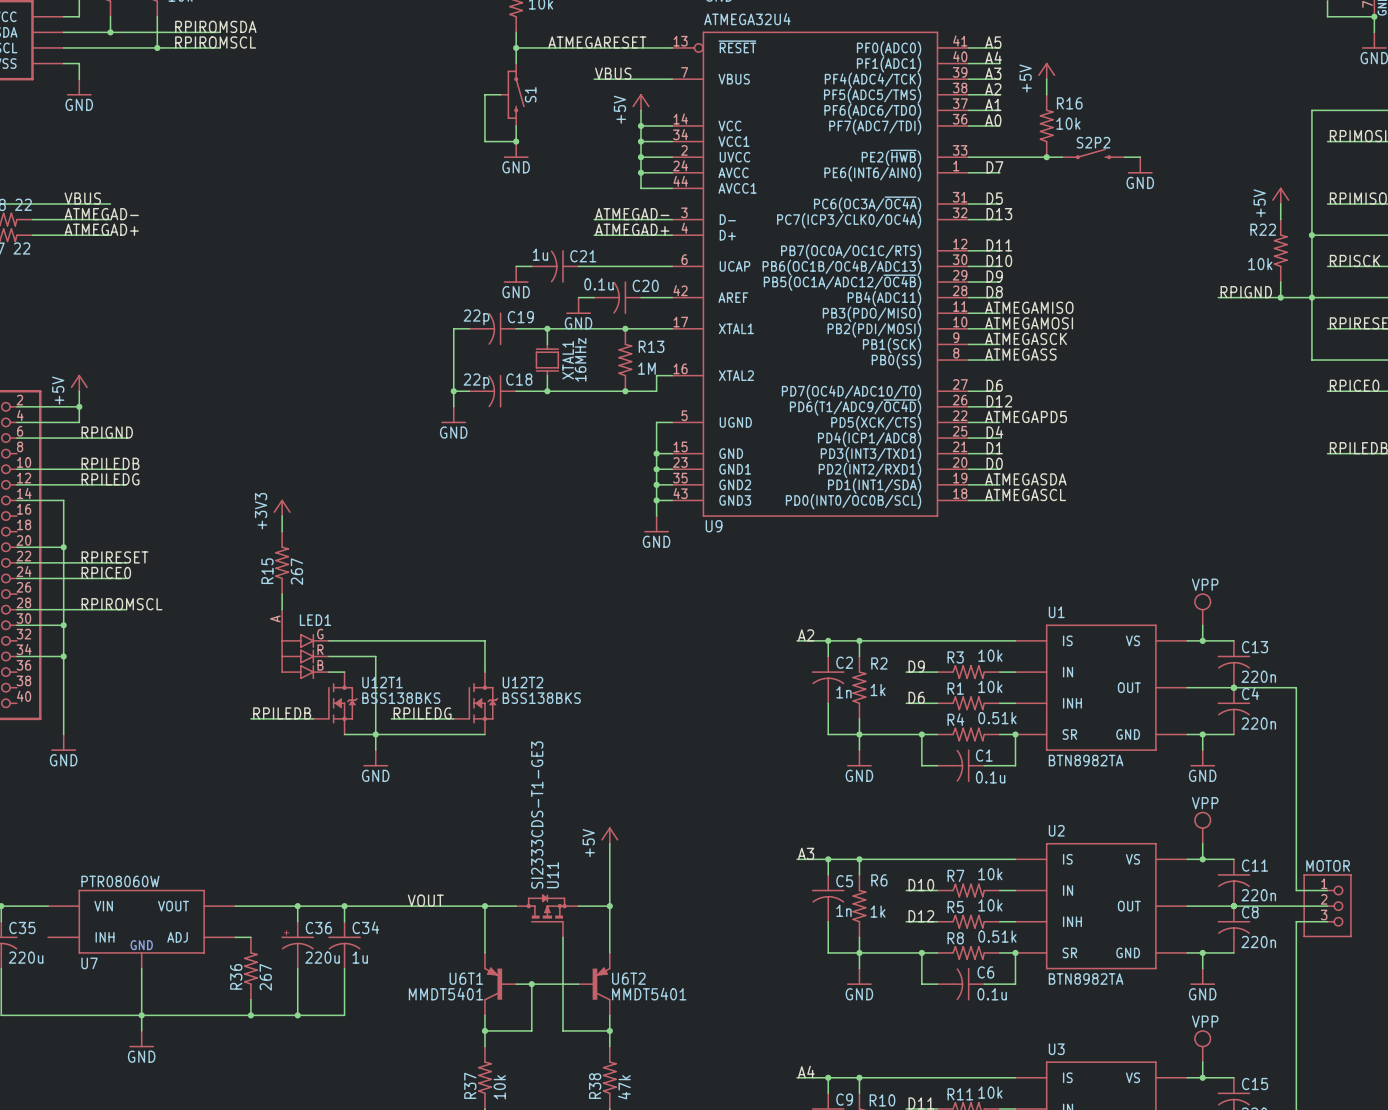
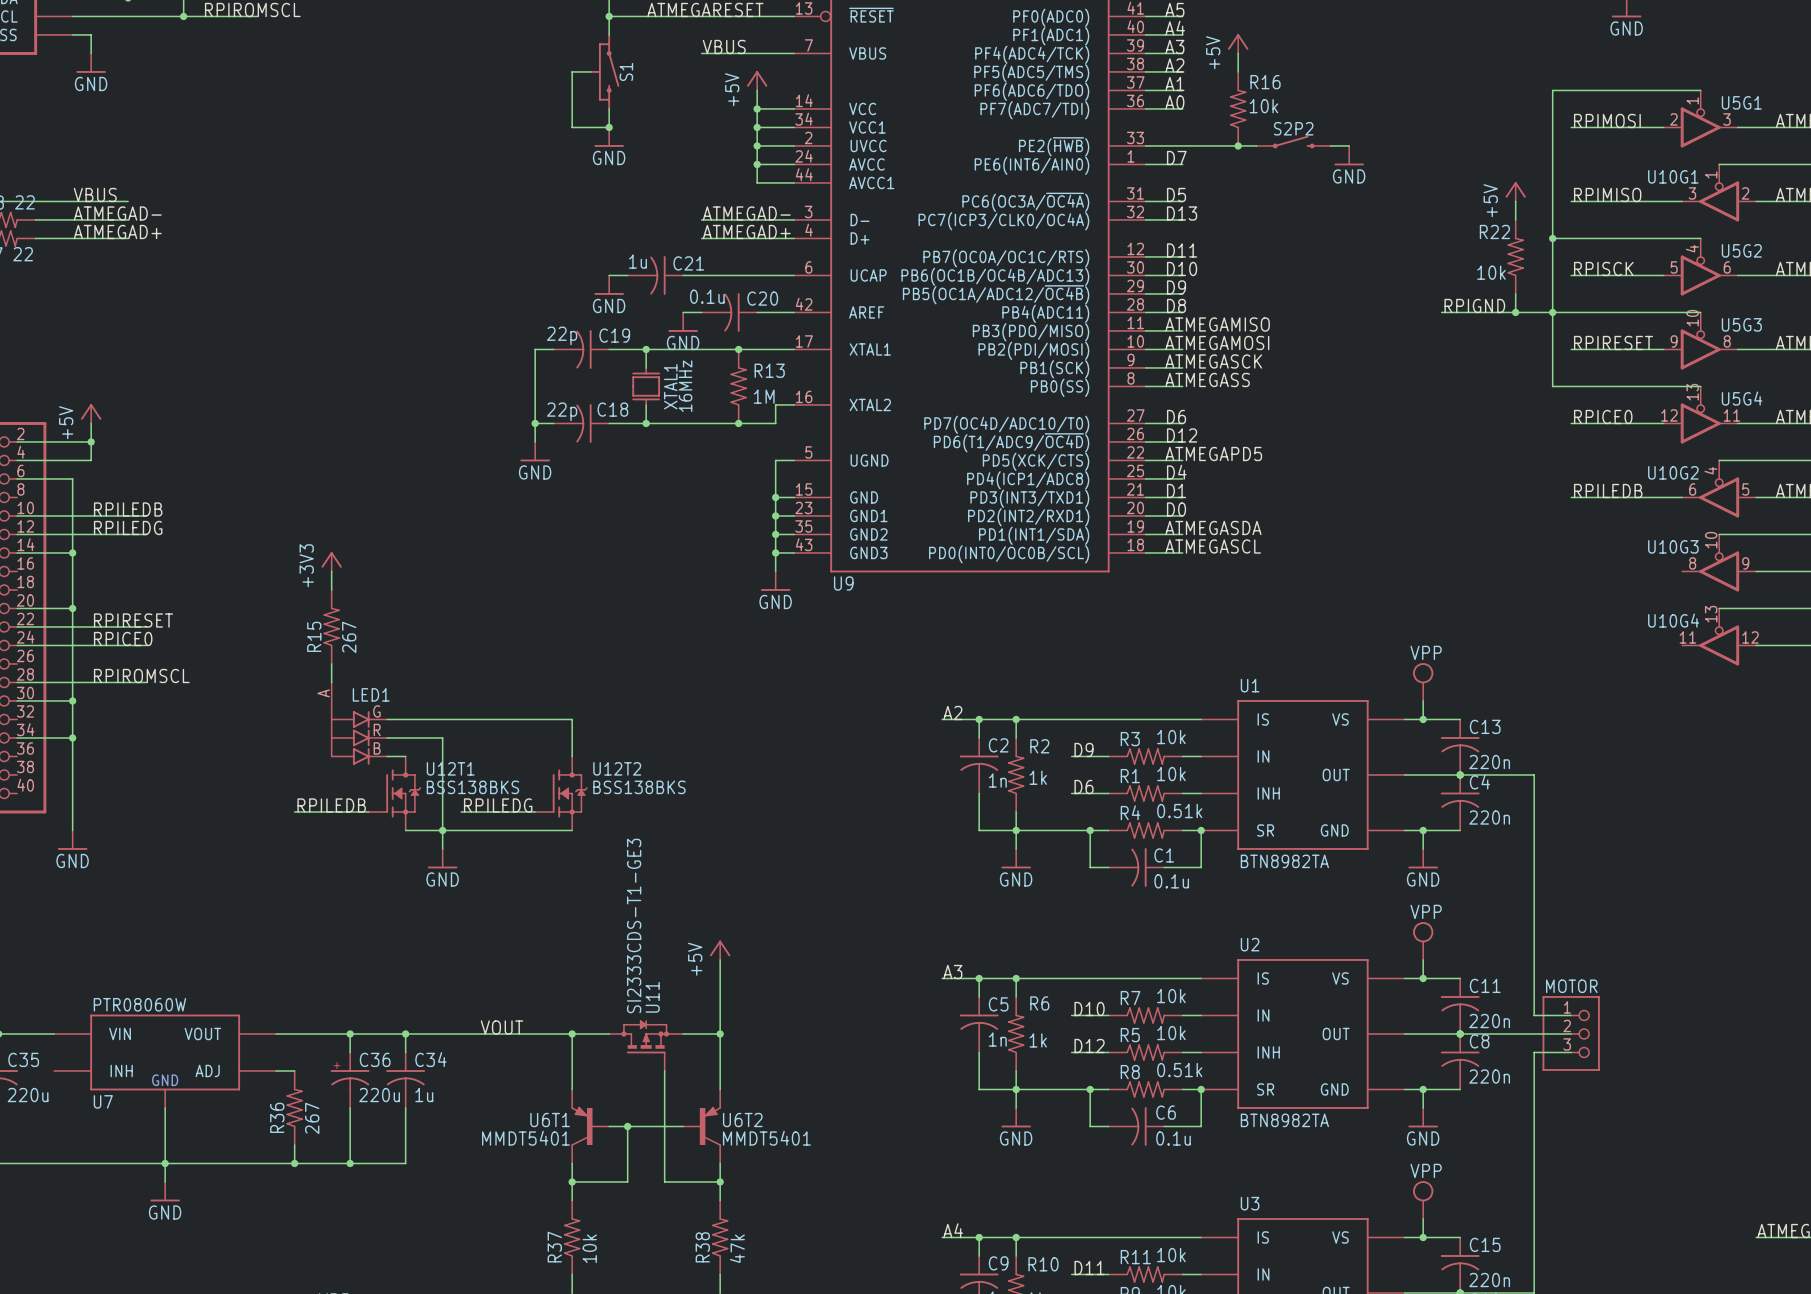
label: RPIGND (107, 432) -> none
wire: (63, 438) (126, 438) -> (72, 478) (72, 552)
junction: none -> (72, 552)

